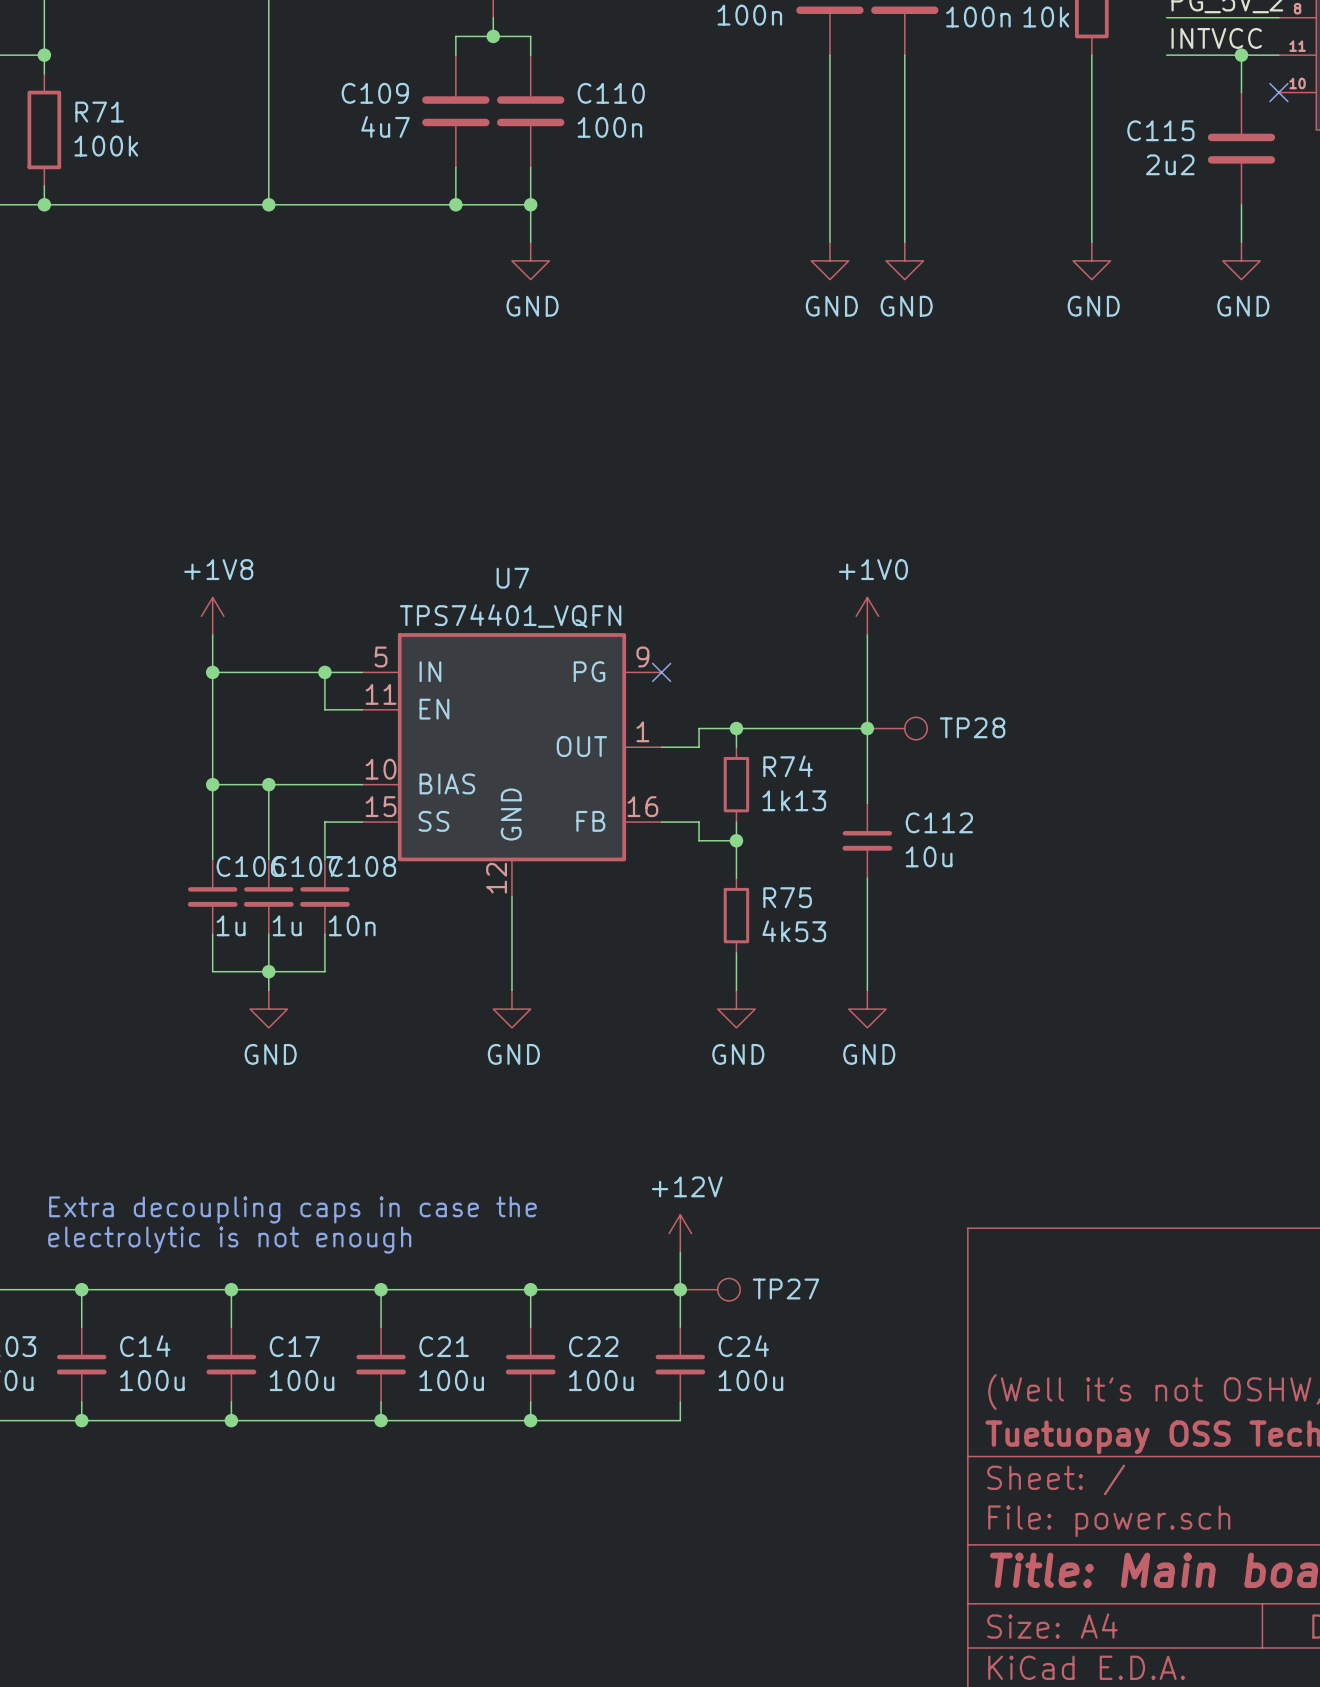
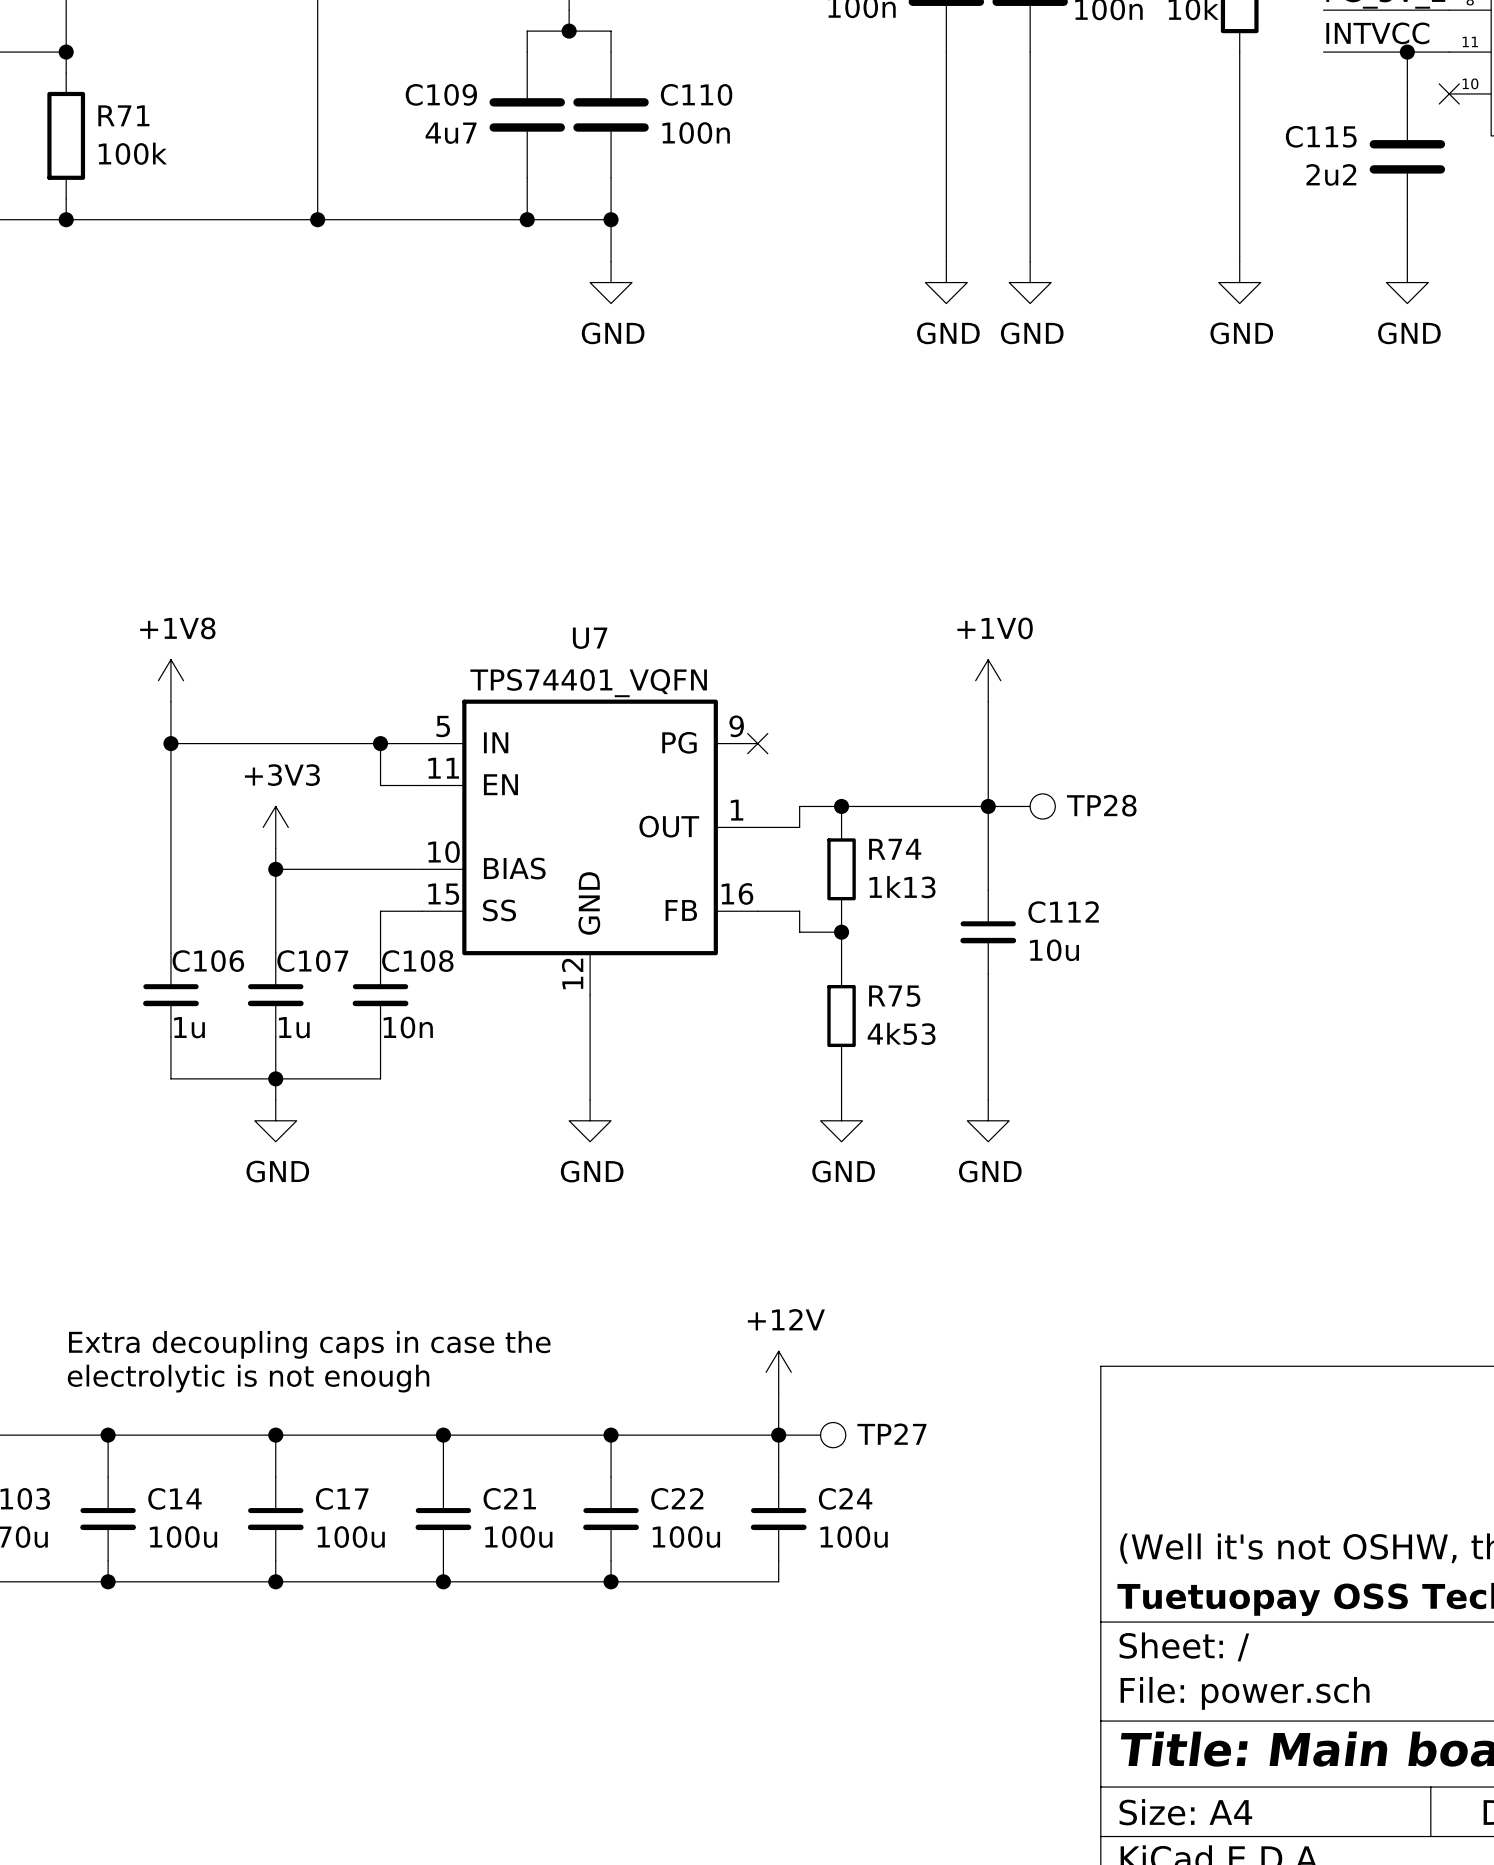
power symbol position: +1V8 (212, 616) -> +1V8 (170, 680)
wire: (212, 635) (212, 859) -> (170, 701) (170, 953)
wire: none -> (170, 743) (254, 743)
junction: none -> (170, 743)
junction: (212, 672) -> none
power symbol: none -> +3V3 (275, 827)
wire: none -> (275, 848) (275, 953)
wire: (212, 784) (231, 784) -> none
junction: (212, 784) -> none
junction: none -> (275, 869)
wire: (268, 784) (268, 859) -> none
junction: (268, 784) -> none
C106 position: (212, 896) -> (170, 995)
C107 position: (268, 896) -> (275, 995)
wire: (212, 934) (212, 971) -> (170, 1036) (170, 1078) (254, 1078)
wire: (268, 934) (268, 990) -> (275, 1036) (275, 1099)
junction position: (268, 971) -> (275, 1078)
power symbol position: GND (268, 1009) -> GND (275, 1120)

